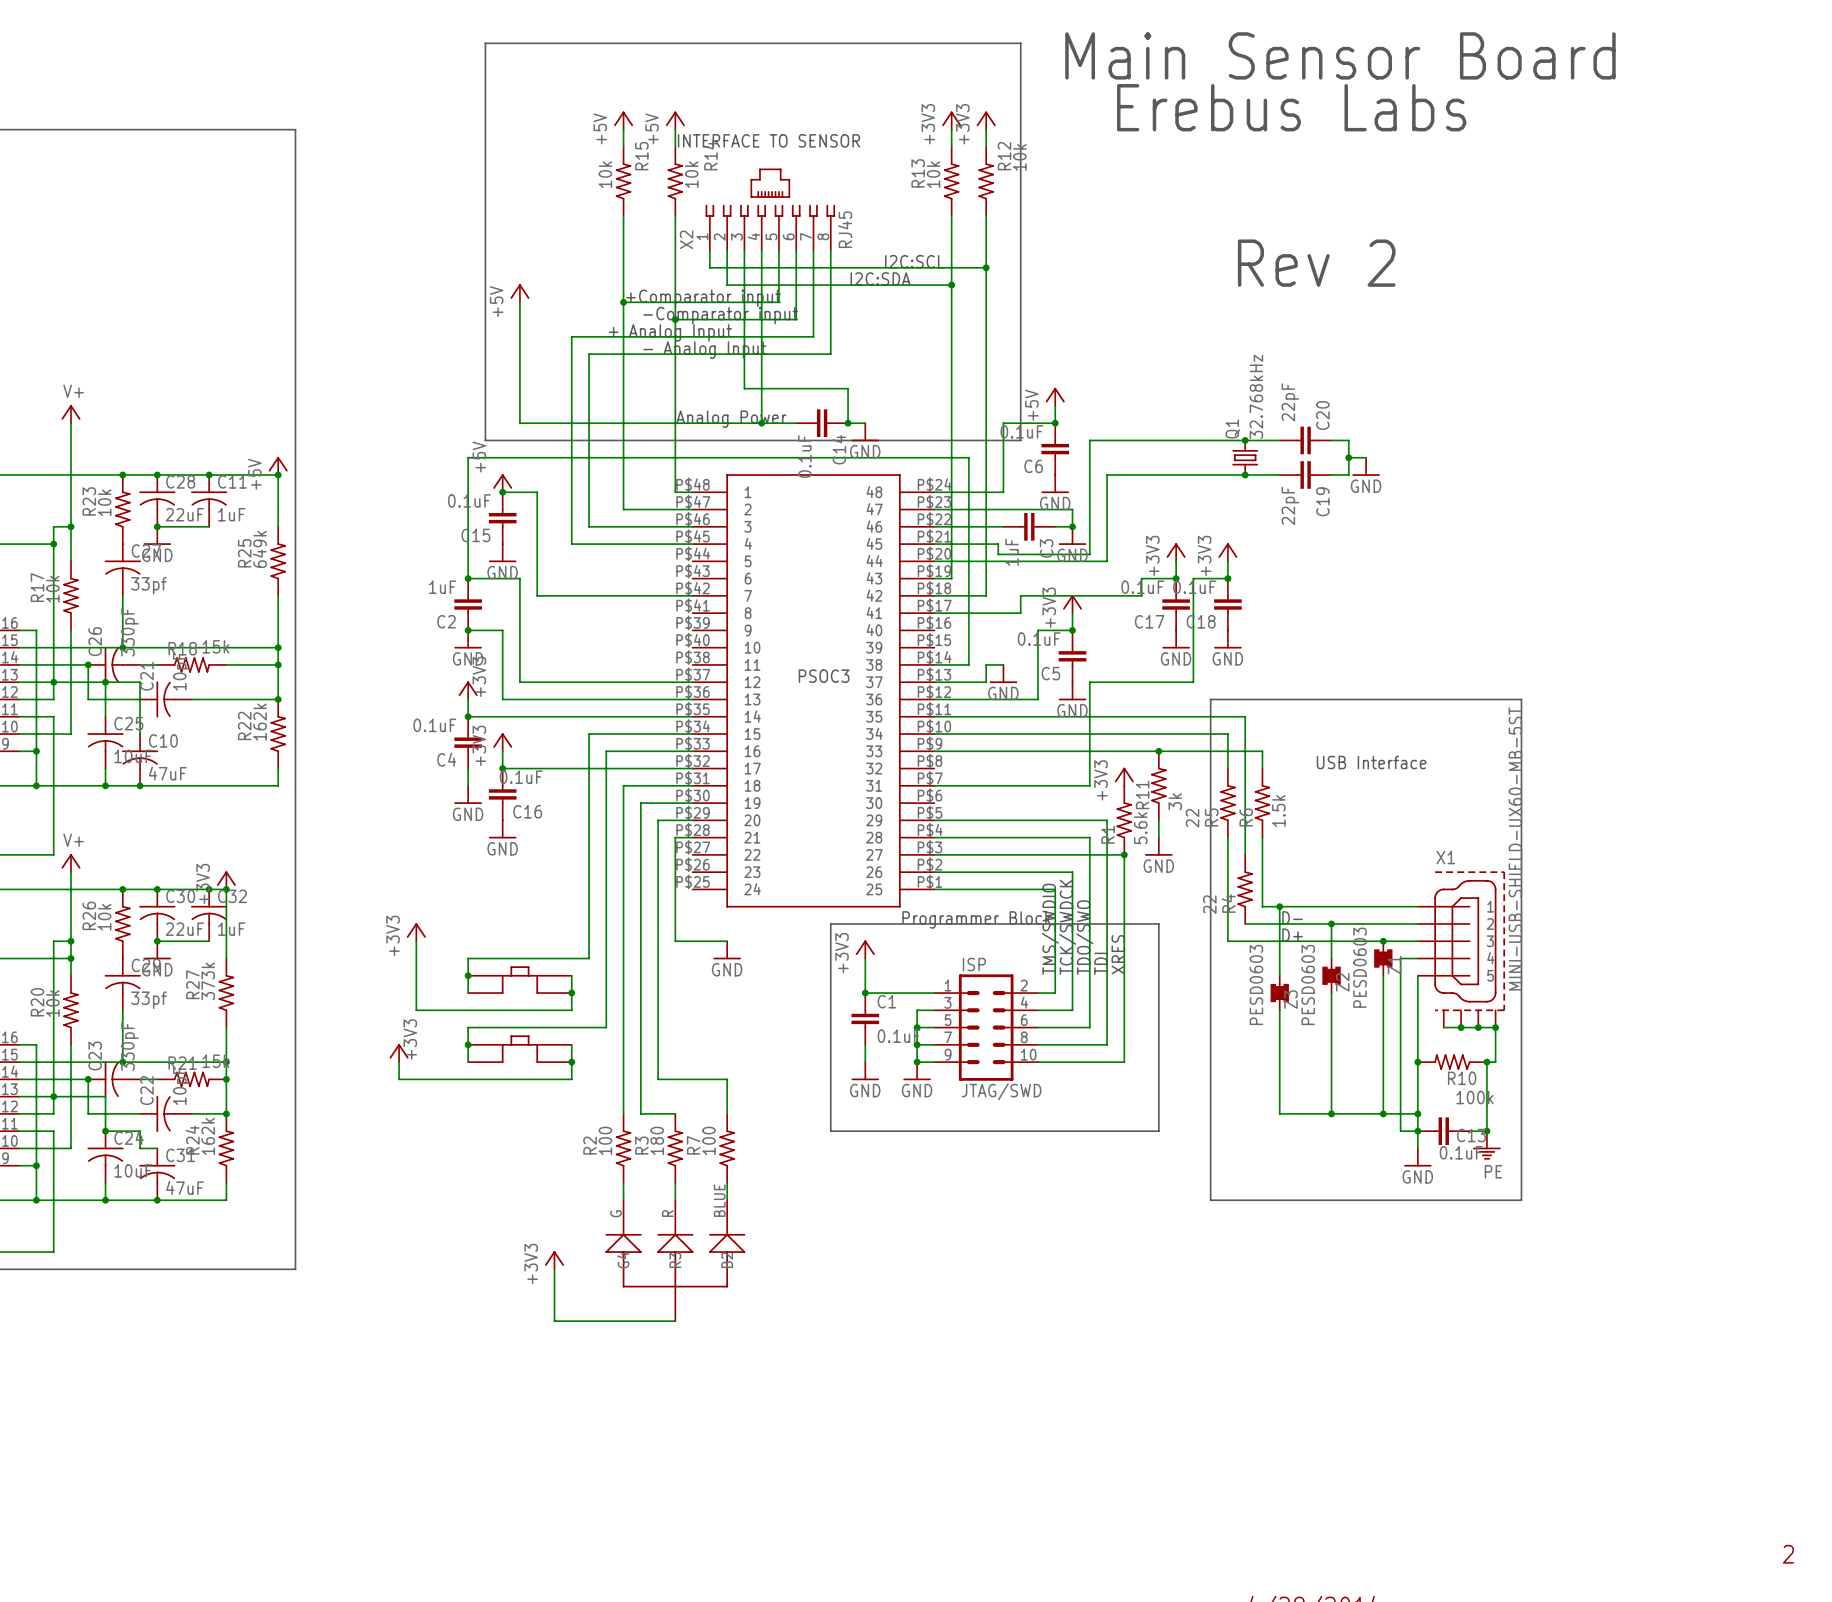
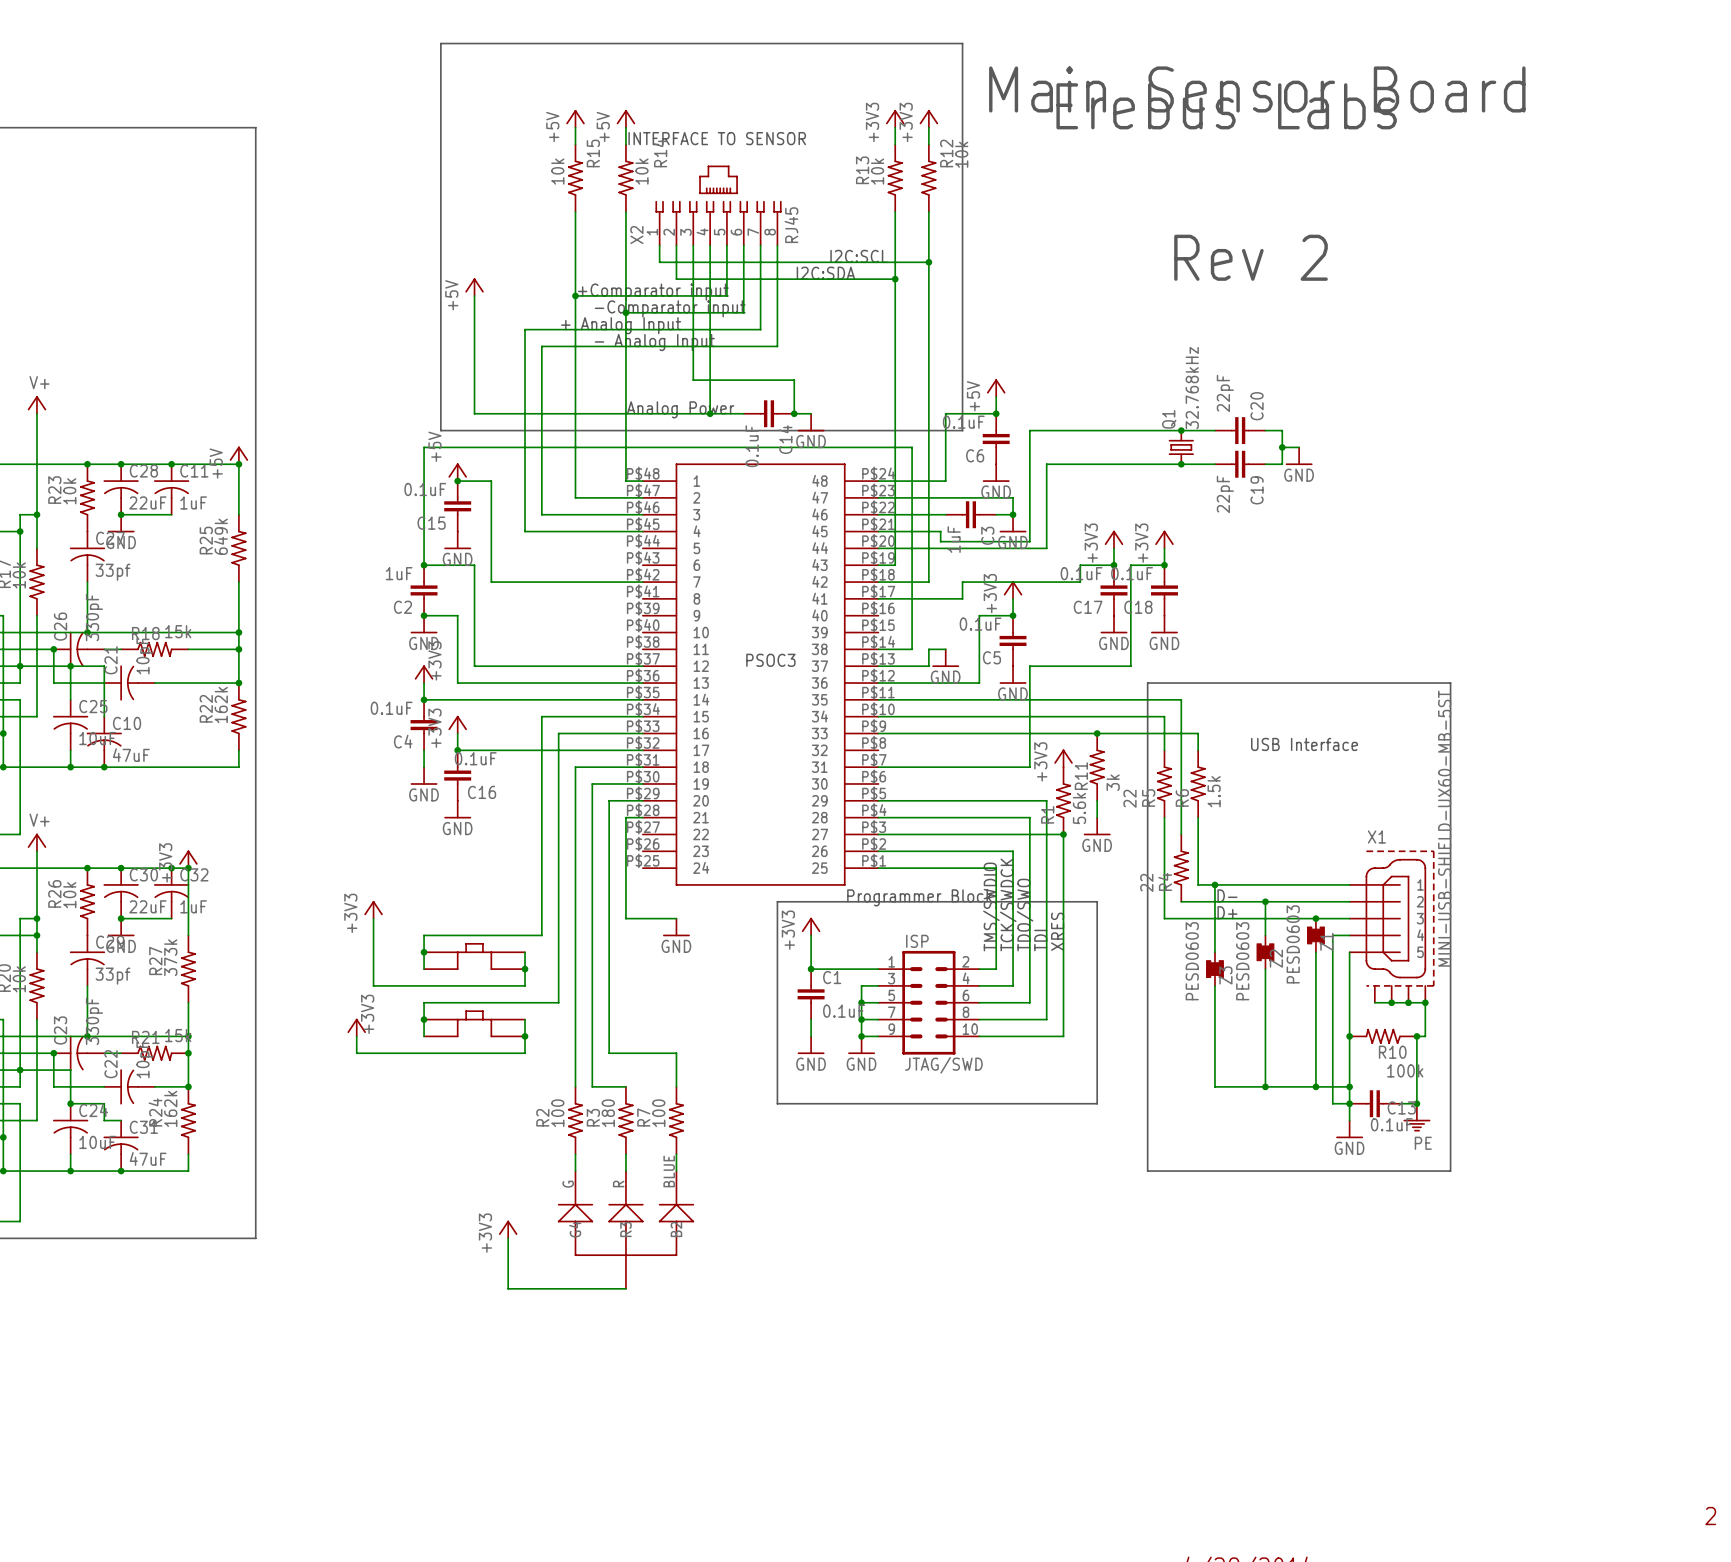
text position: Main Sensor Board (1340, 55) -> Main Sensor Board (1257, 89)

